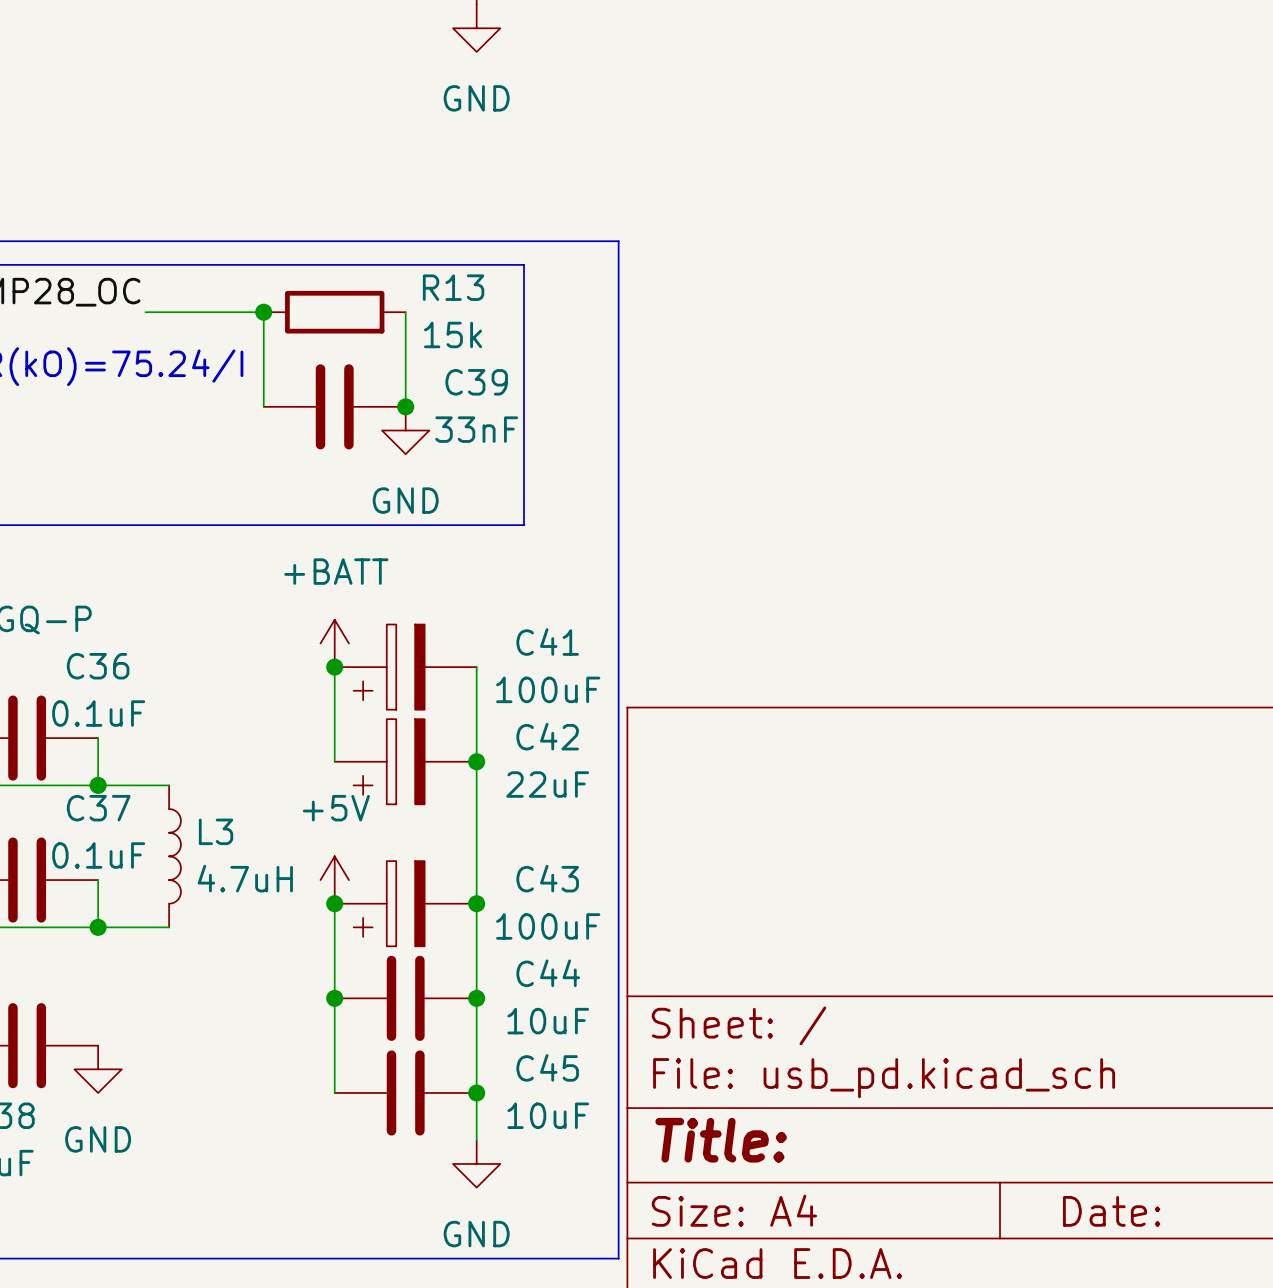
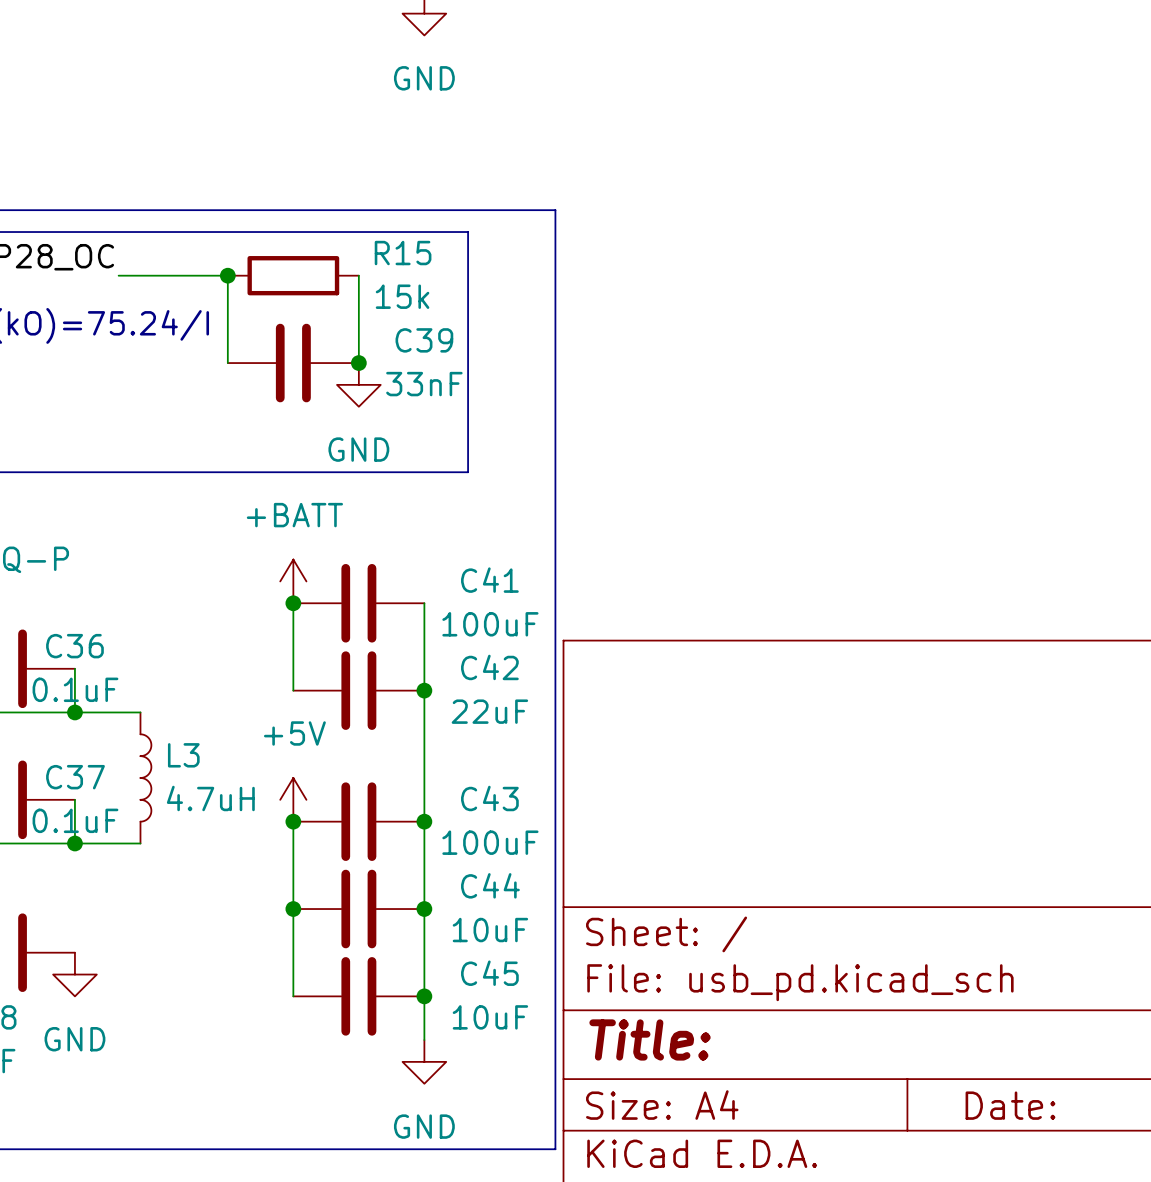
R13 name: R13 (453, 287) -> R15 (403, 253)
C41 symbol: [334, 624, 477, 710] -> [293, 563, 425, 643]
C36 name position: C36 (98, 666) -> C36 (74, 646)
C36 value position: 0.1uF (98, 713) -> 0.1uF (75, 689)
C42 symbol: [334, 719, 477, 805] -> [293, 651, 425, 730]
C37 name position: C37 (98, 808) -> C37 (75, 777)
C37 value position: 0.1uF (98, 855) -> 0.1uF (75, 820)
C43 symbol: [334, 861, 477, 947] -> [293, 782, 425, 861]

